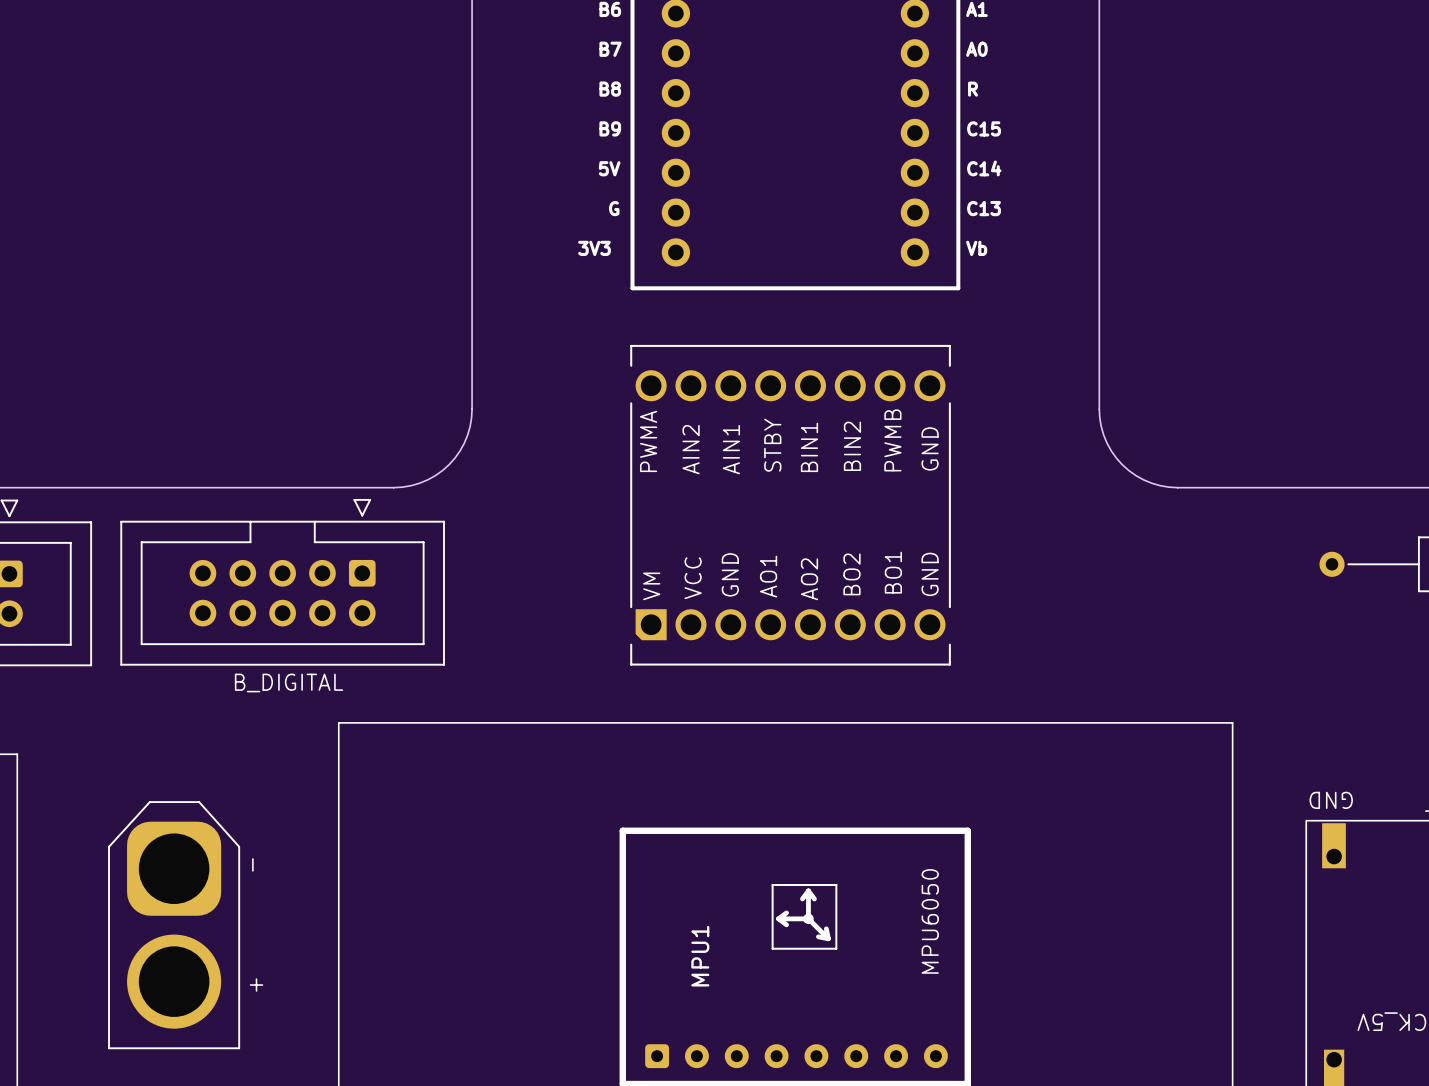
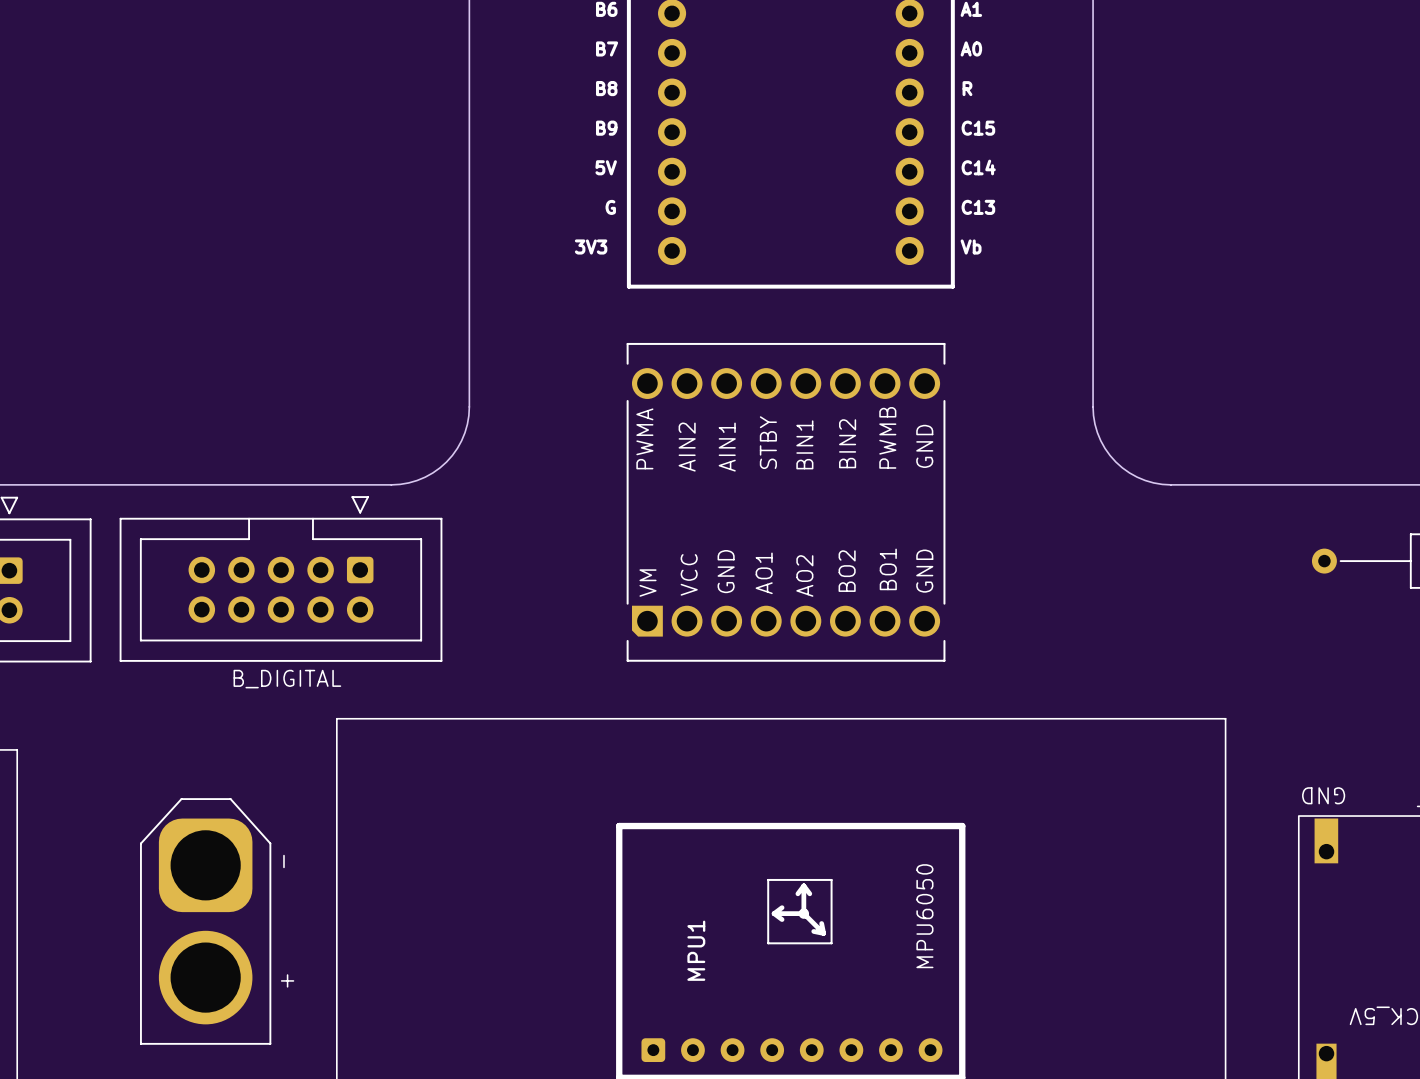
part position: (174, 925) -> (205, 921)

